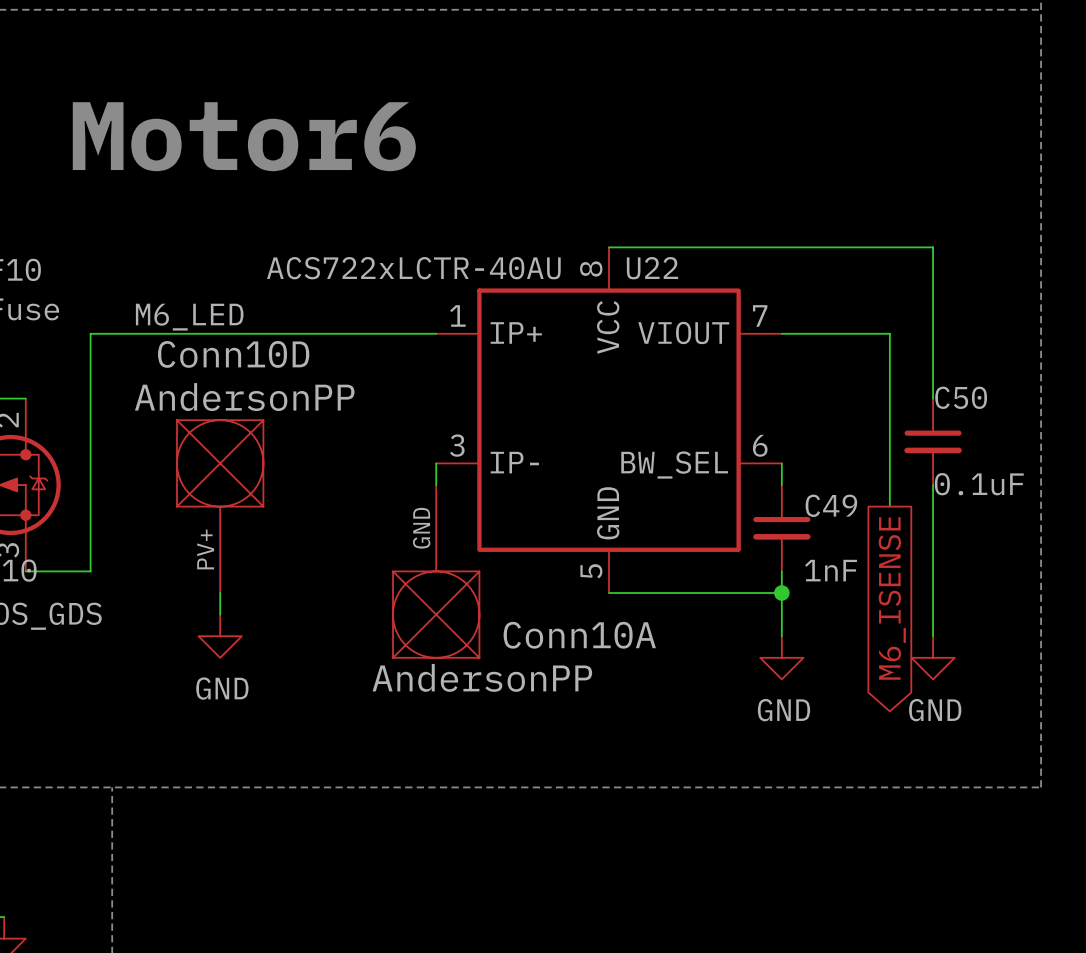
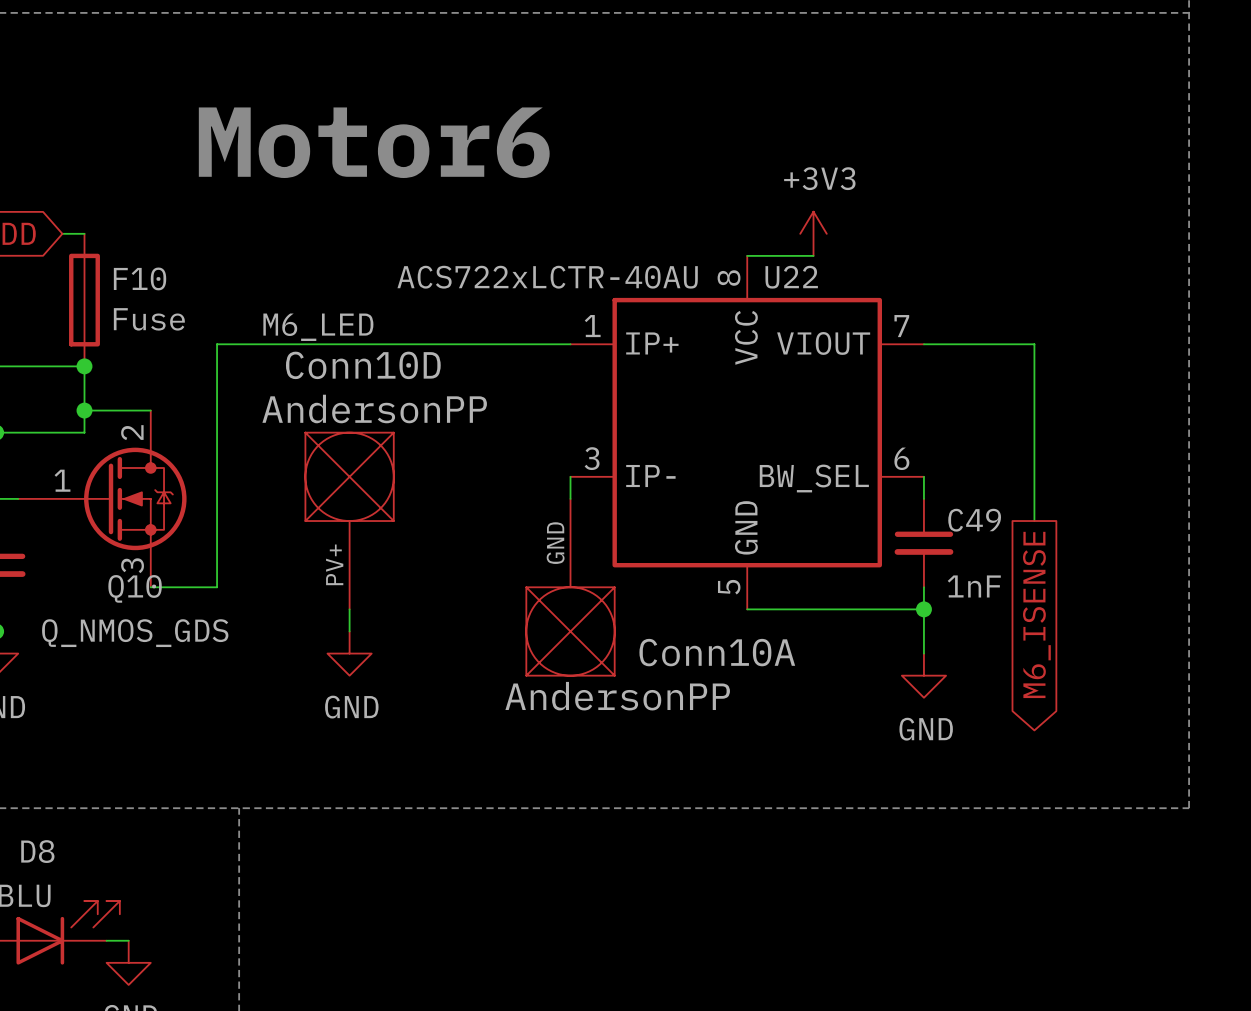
power symbol: none -> +3V3 (813, 233)
wire: (673, 247) (933, 247) (933, 398) -> none
C50: 0.1uF (933, 441) -> none
wire: (933, 485) (933, 636) -> none
power symbol: GND (933, 657) -> none

